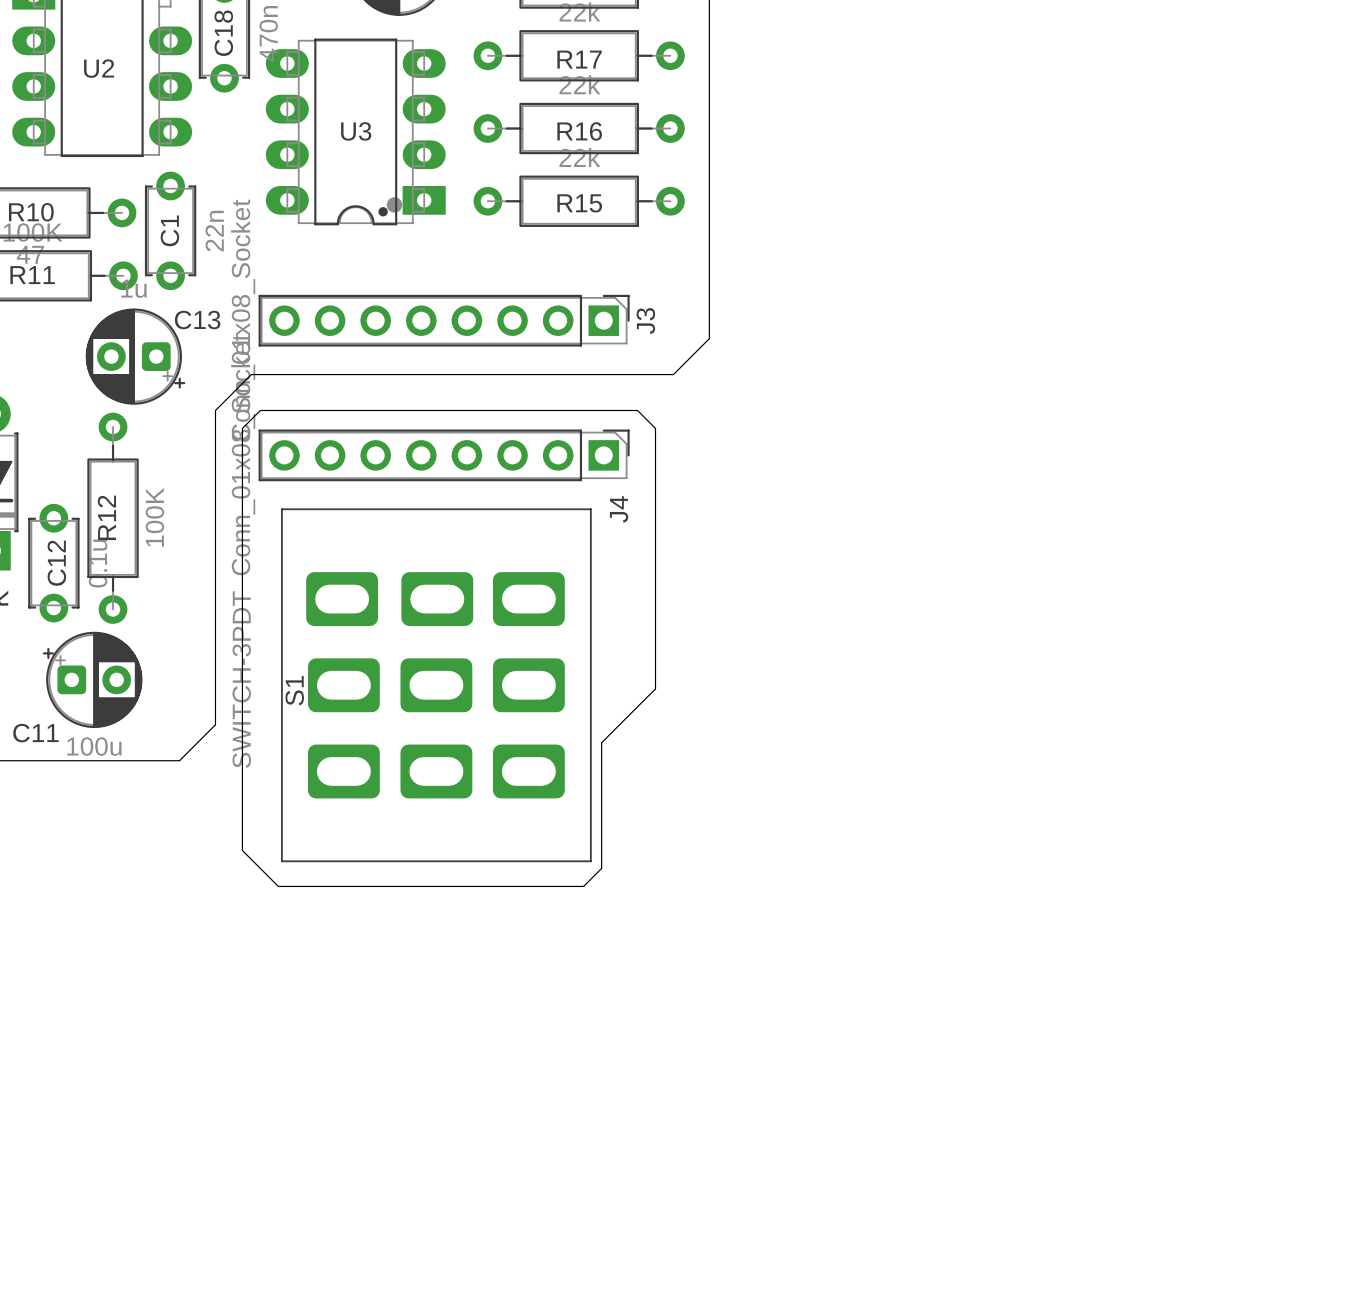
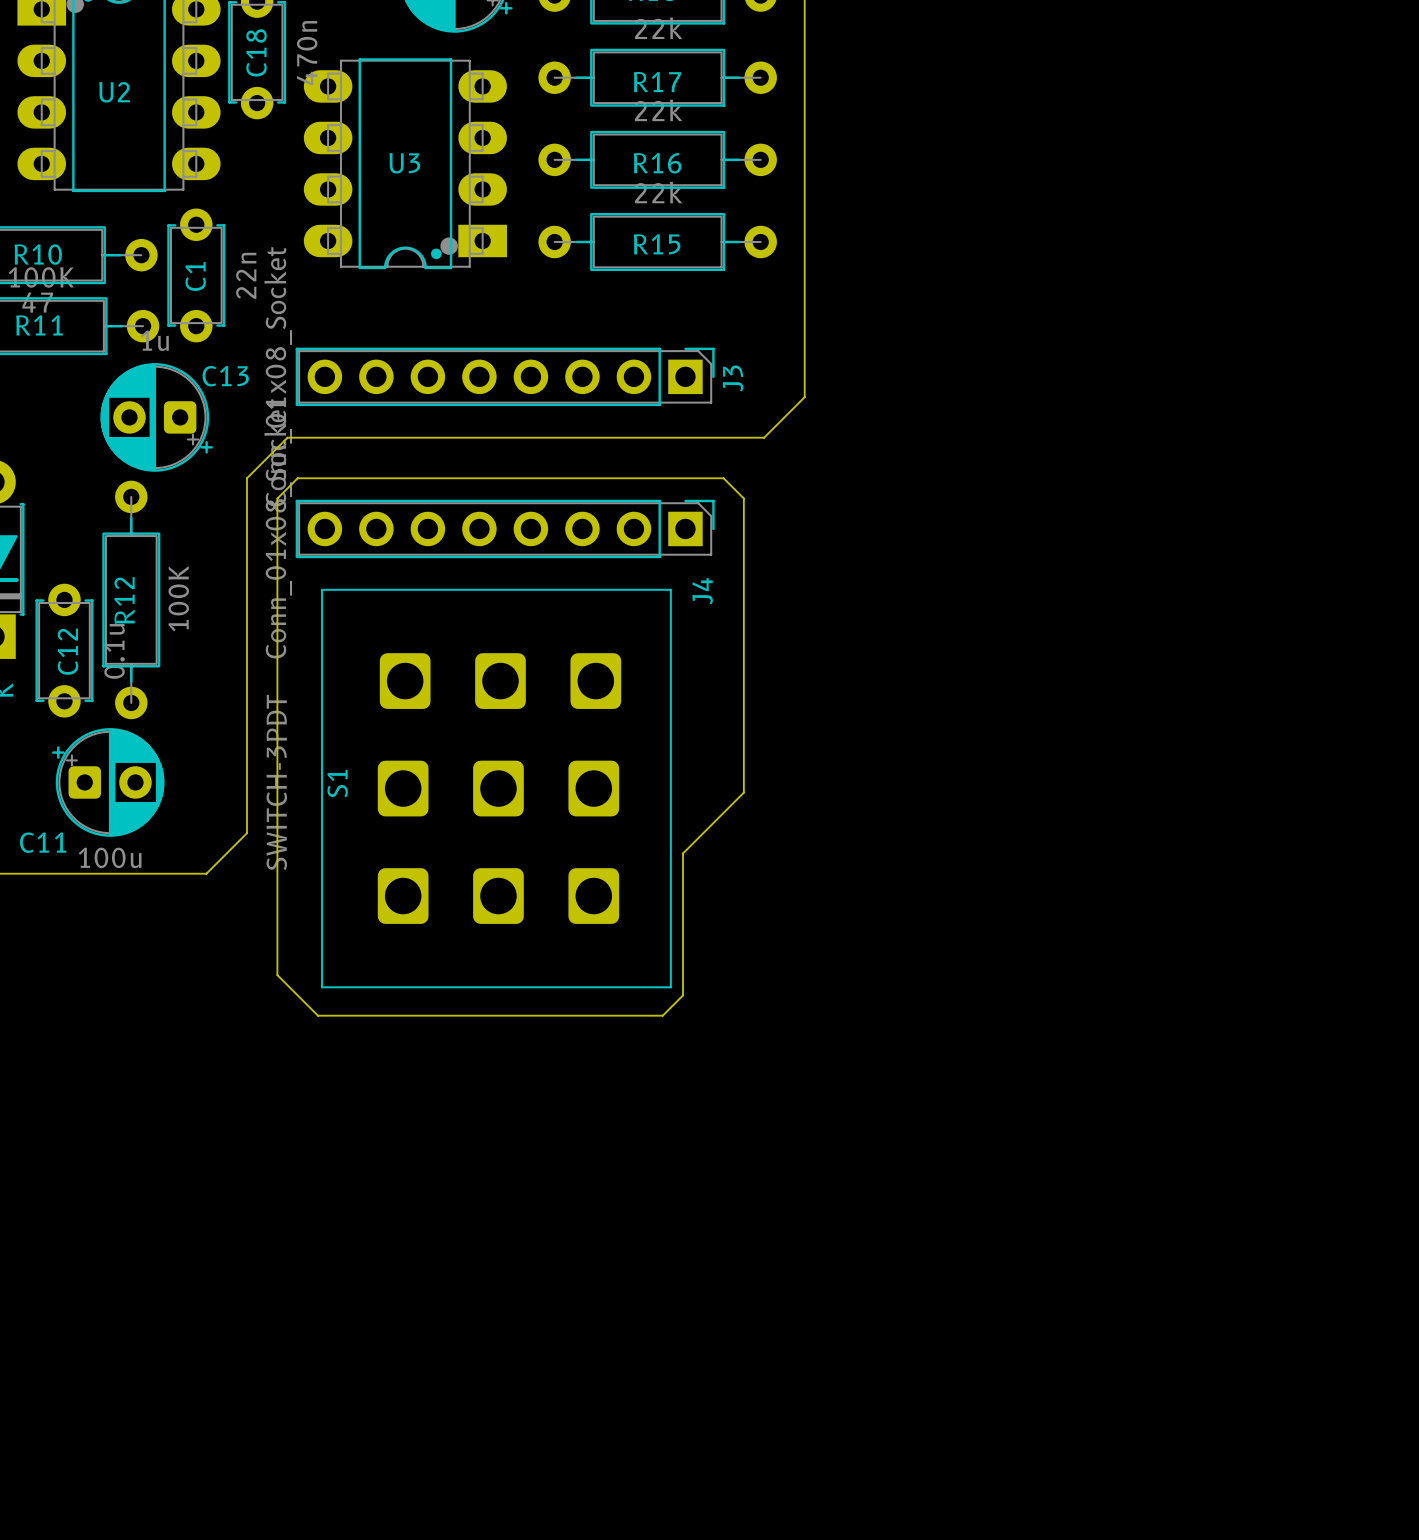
S1 footprint: [281, 508, 592, 863] -> [321, 588, 672, 989]

